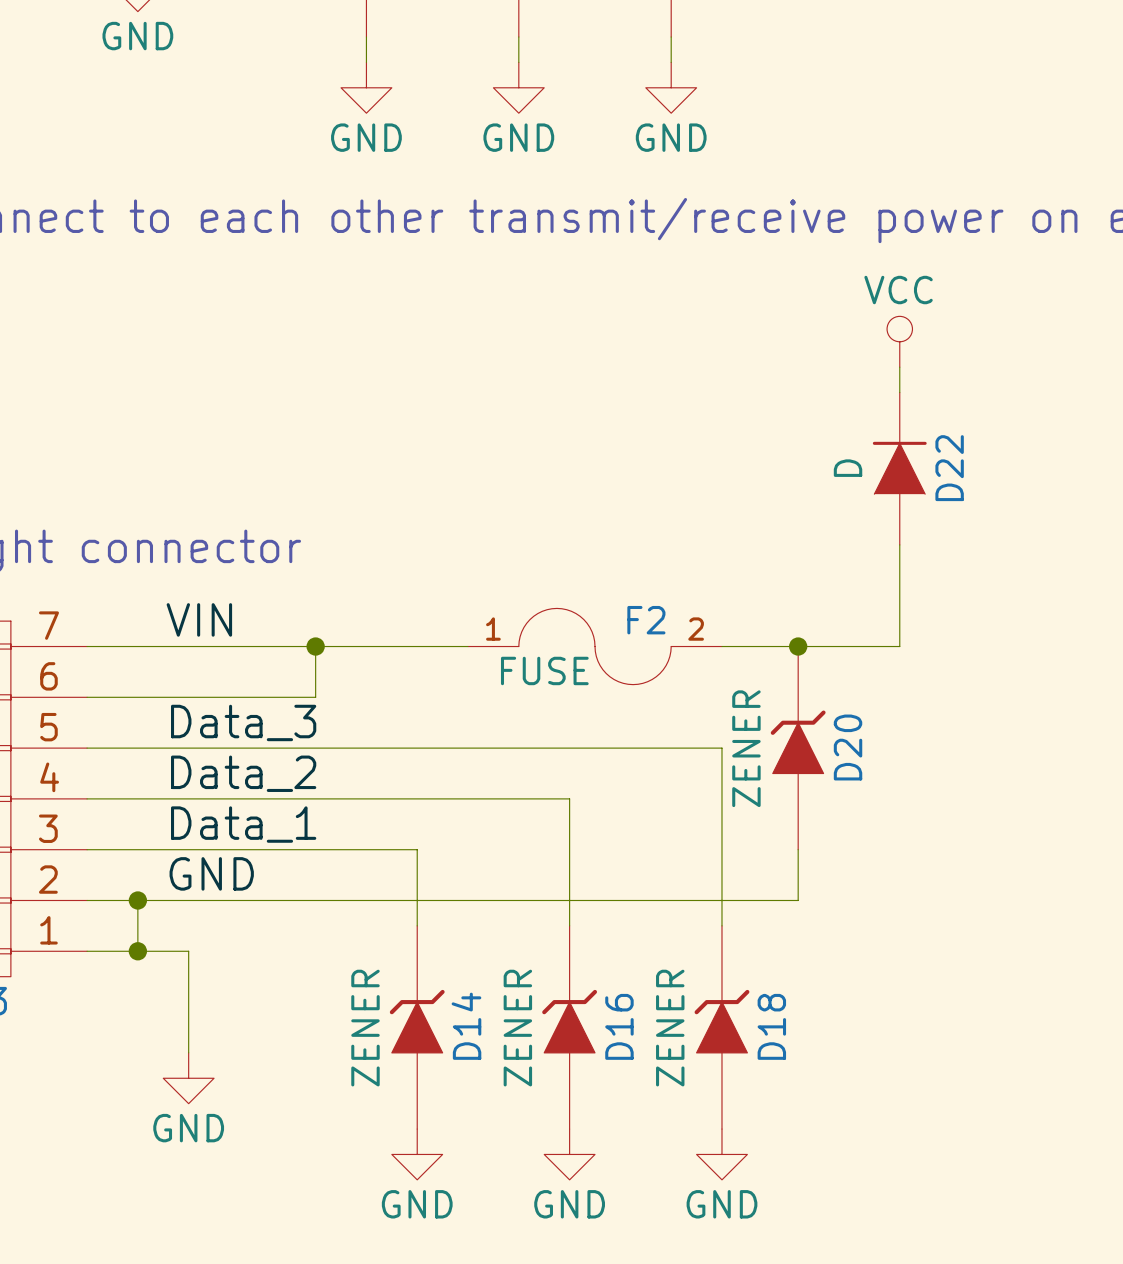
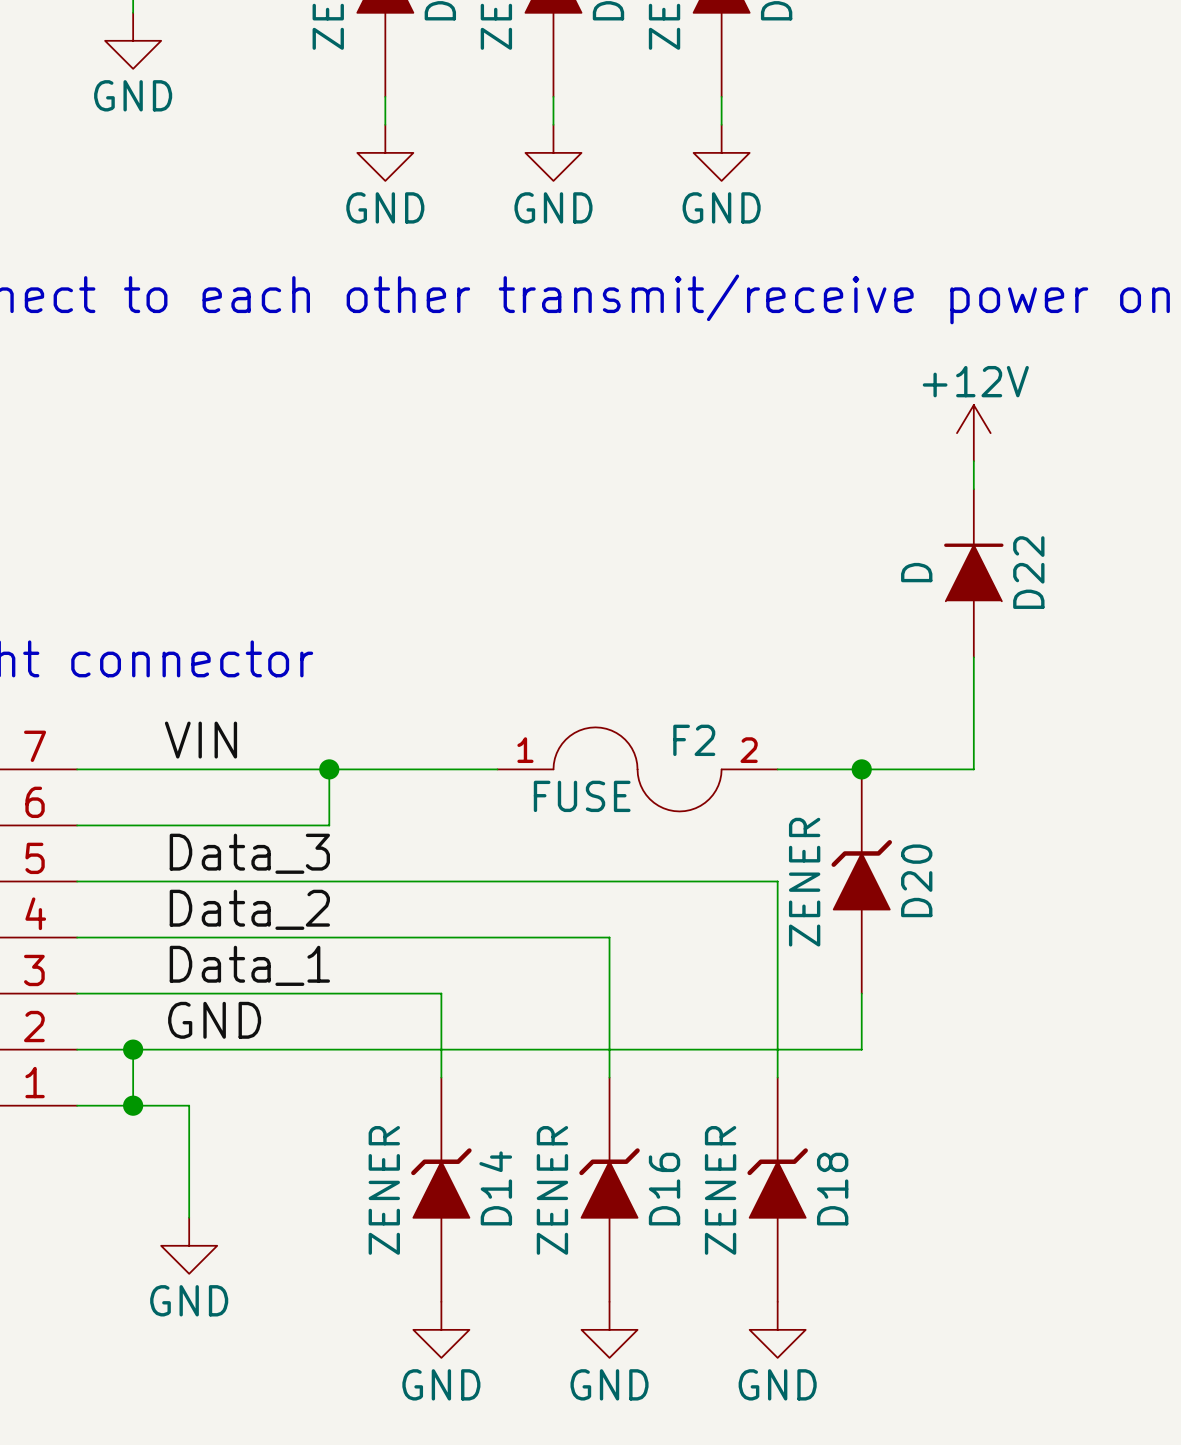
power symbol: VCC (899, 341) -> +12V (973, 433)

